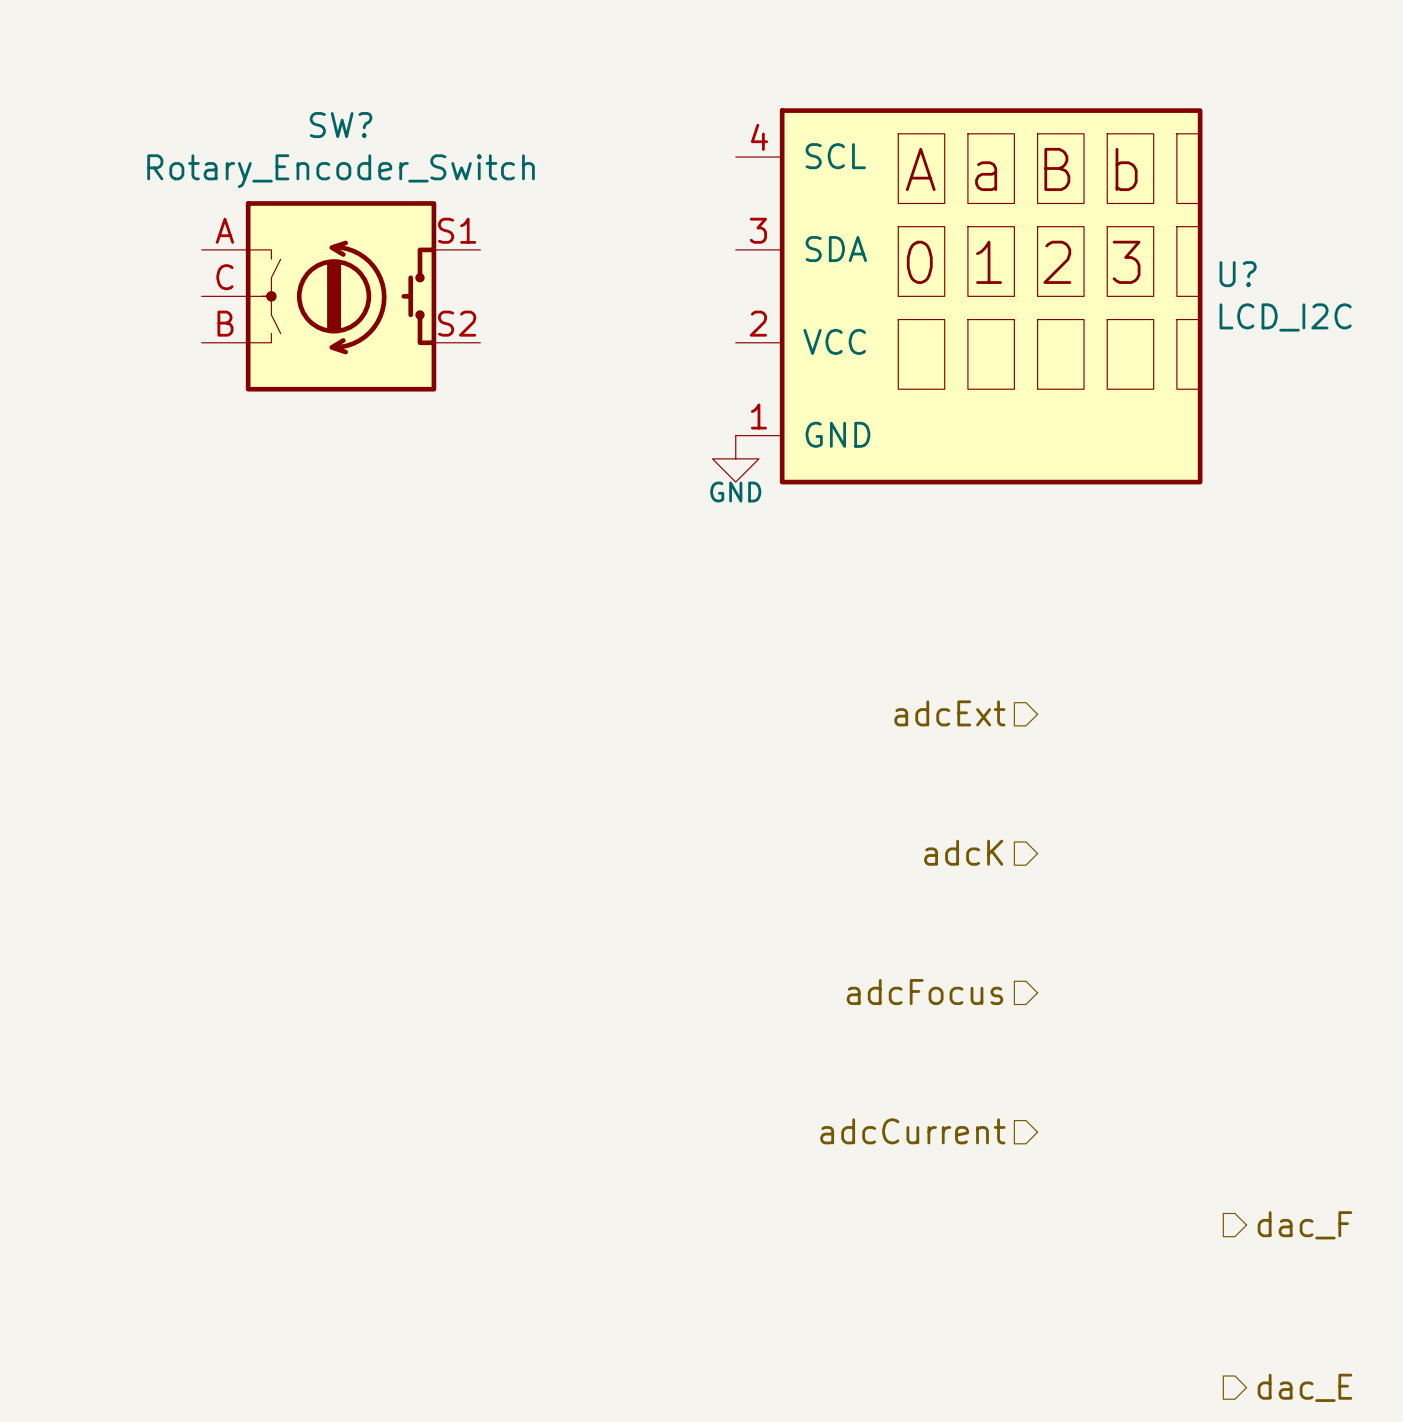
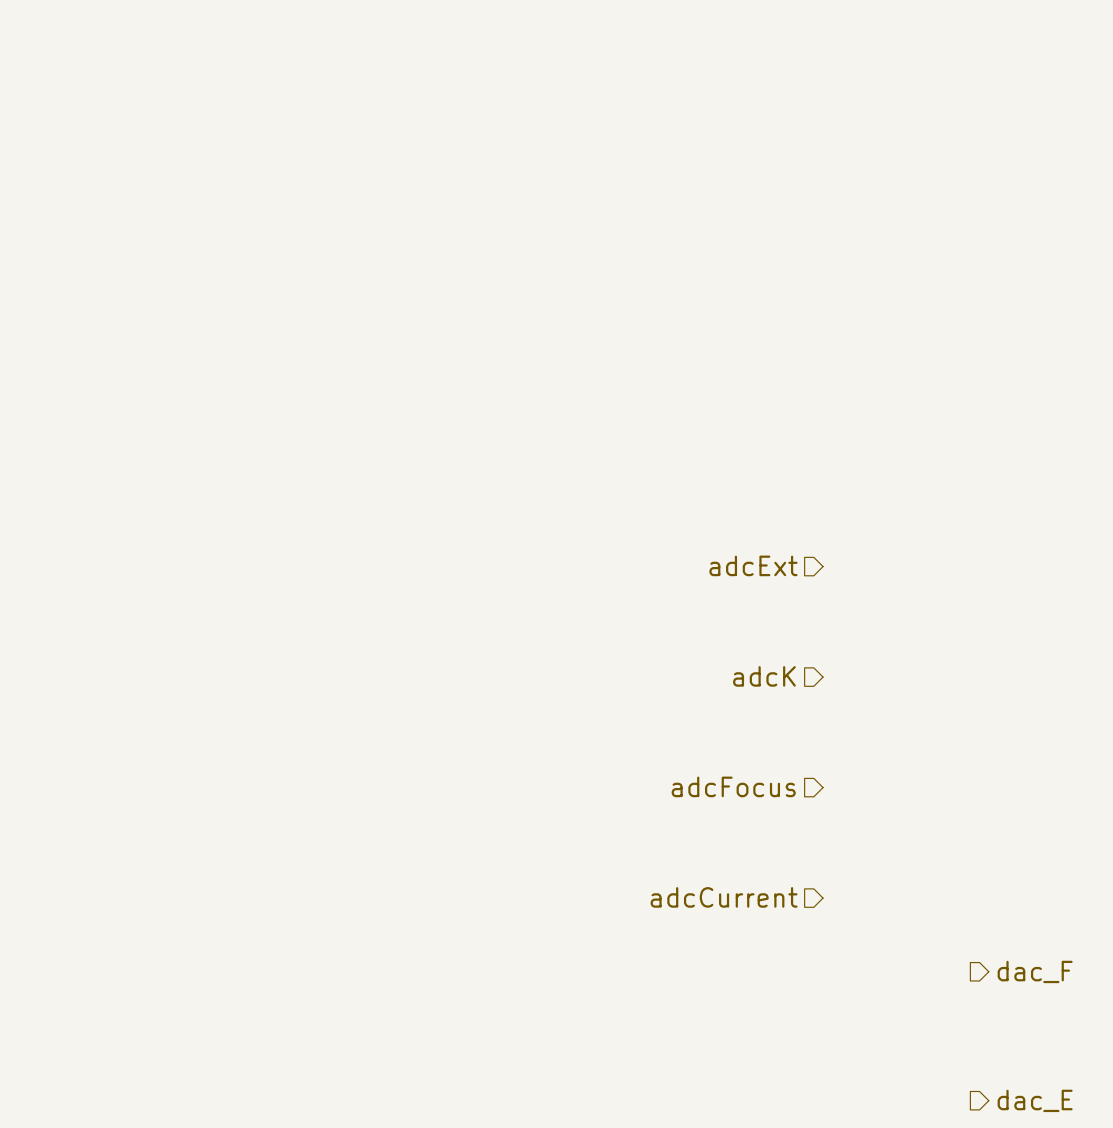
SW?: Rotary_Encoder_Switch (341, 296) -> none
U?: LCD_I2C (969, 296) -> none
power symbol: GND (735, 458) -> none

